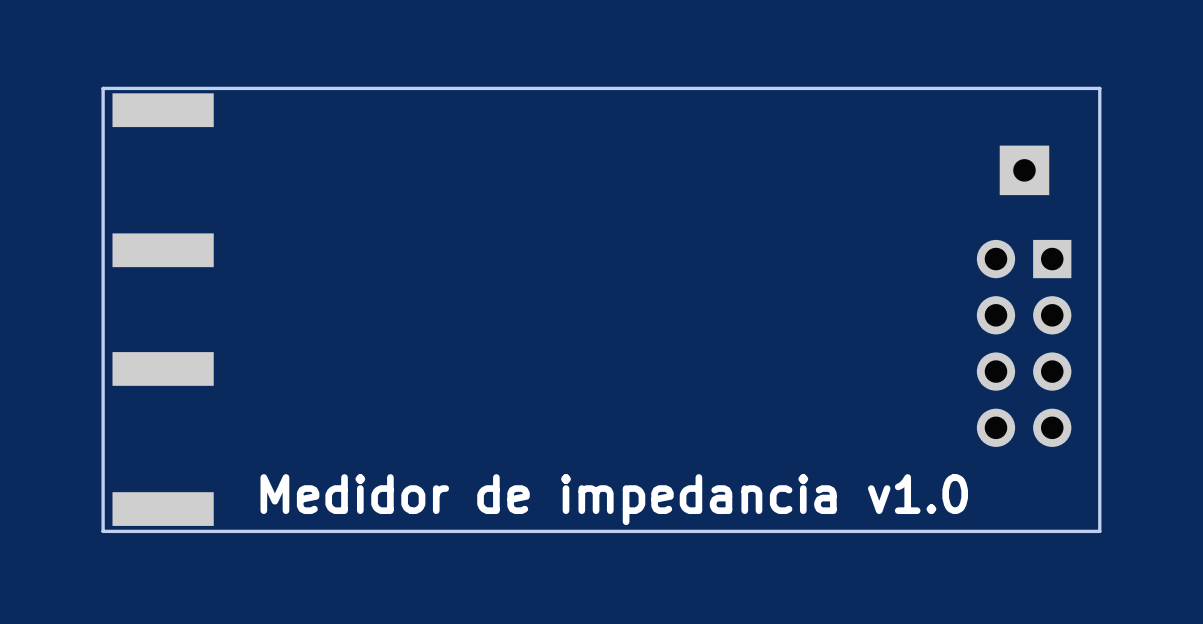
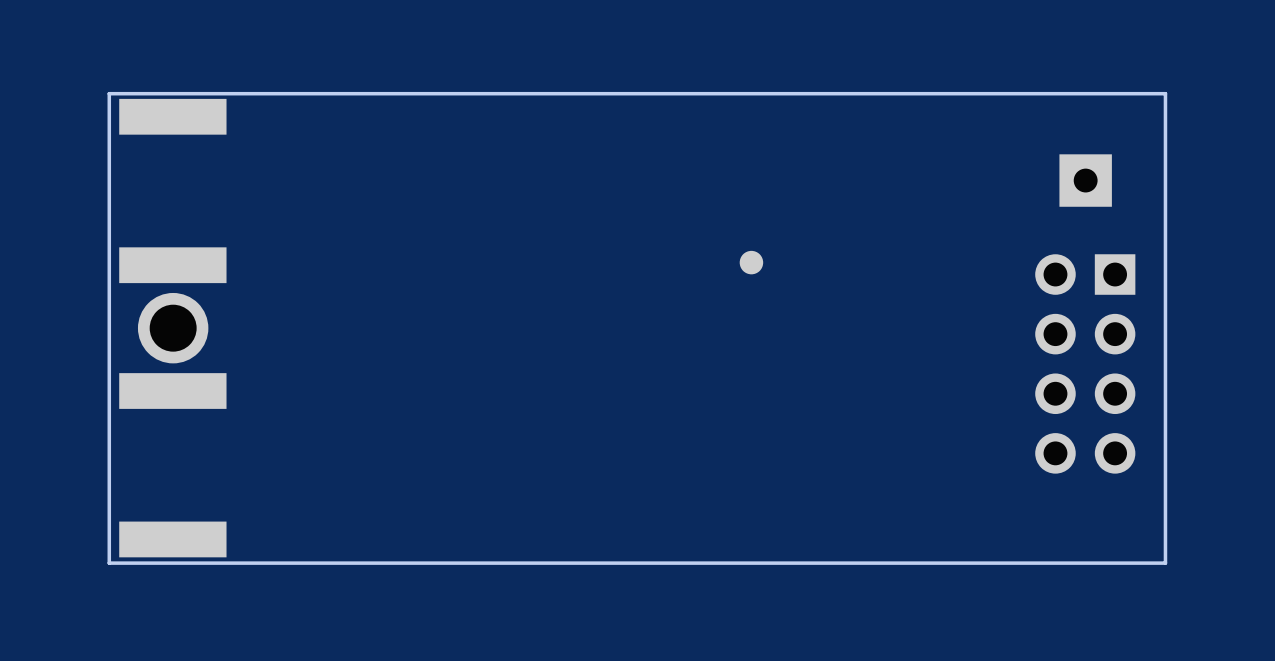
part: none -> (751, 262)
part: none -> (173, 328)
text: Medidor de impedancia v1.0 (614, 499) -> none

